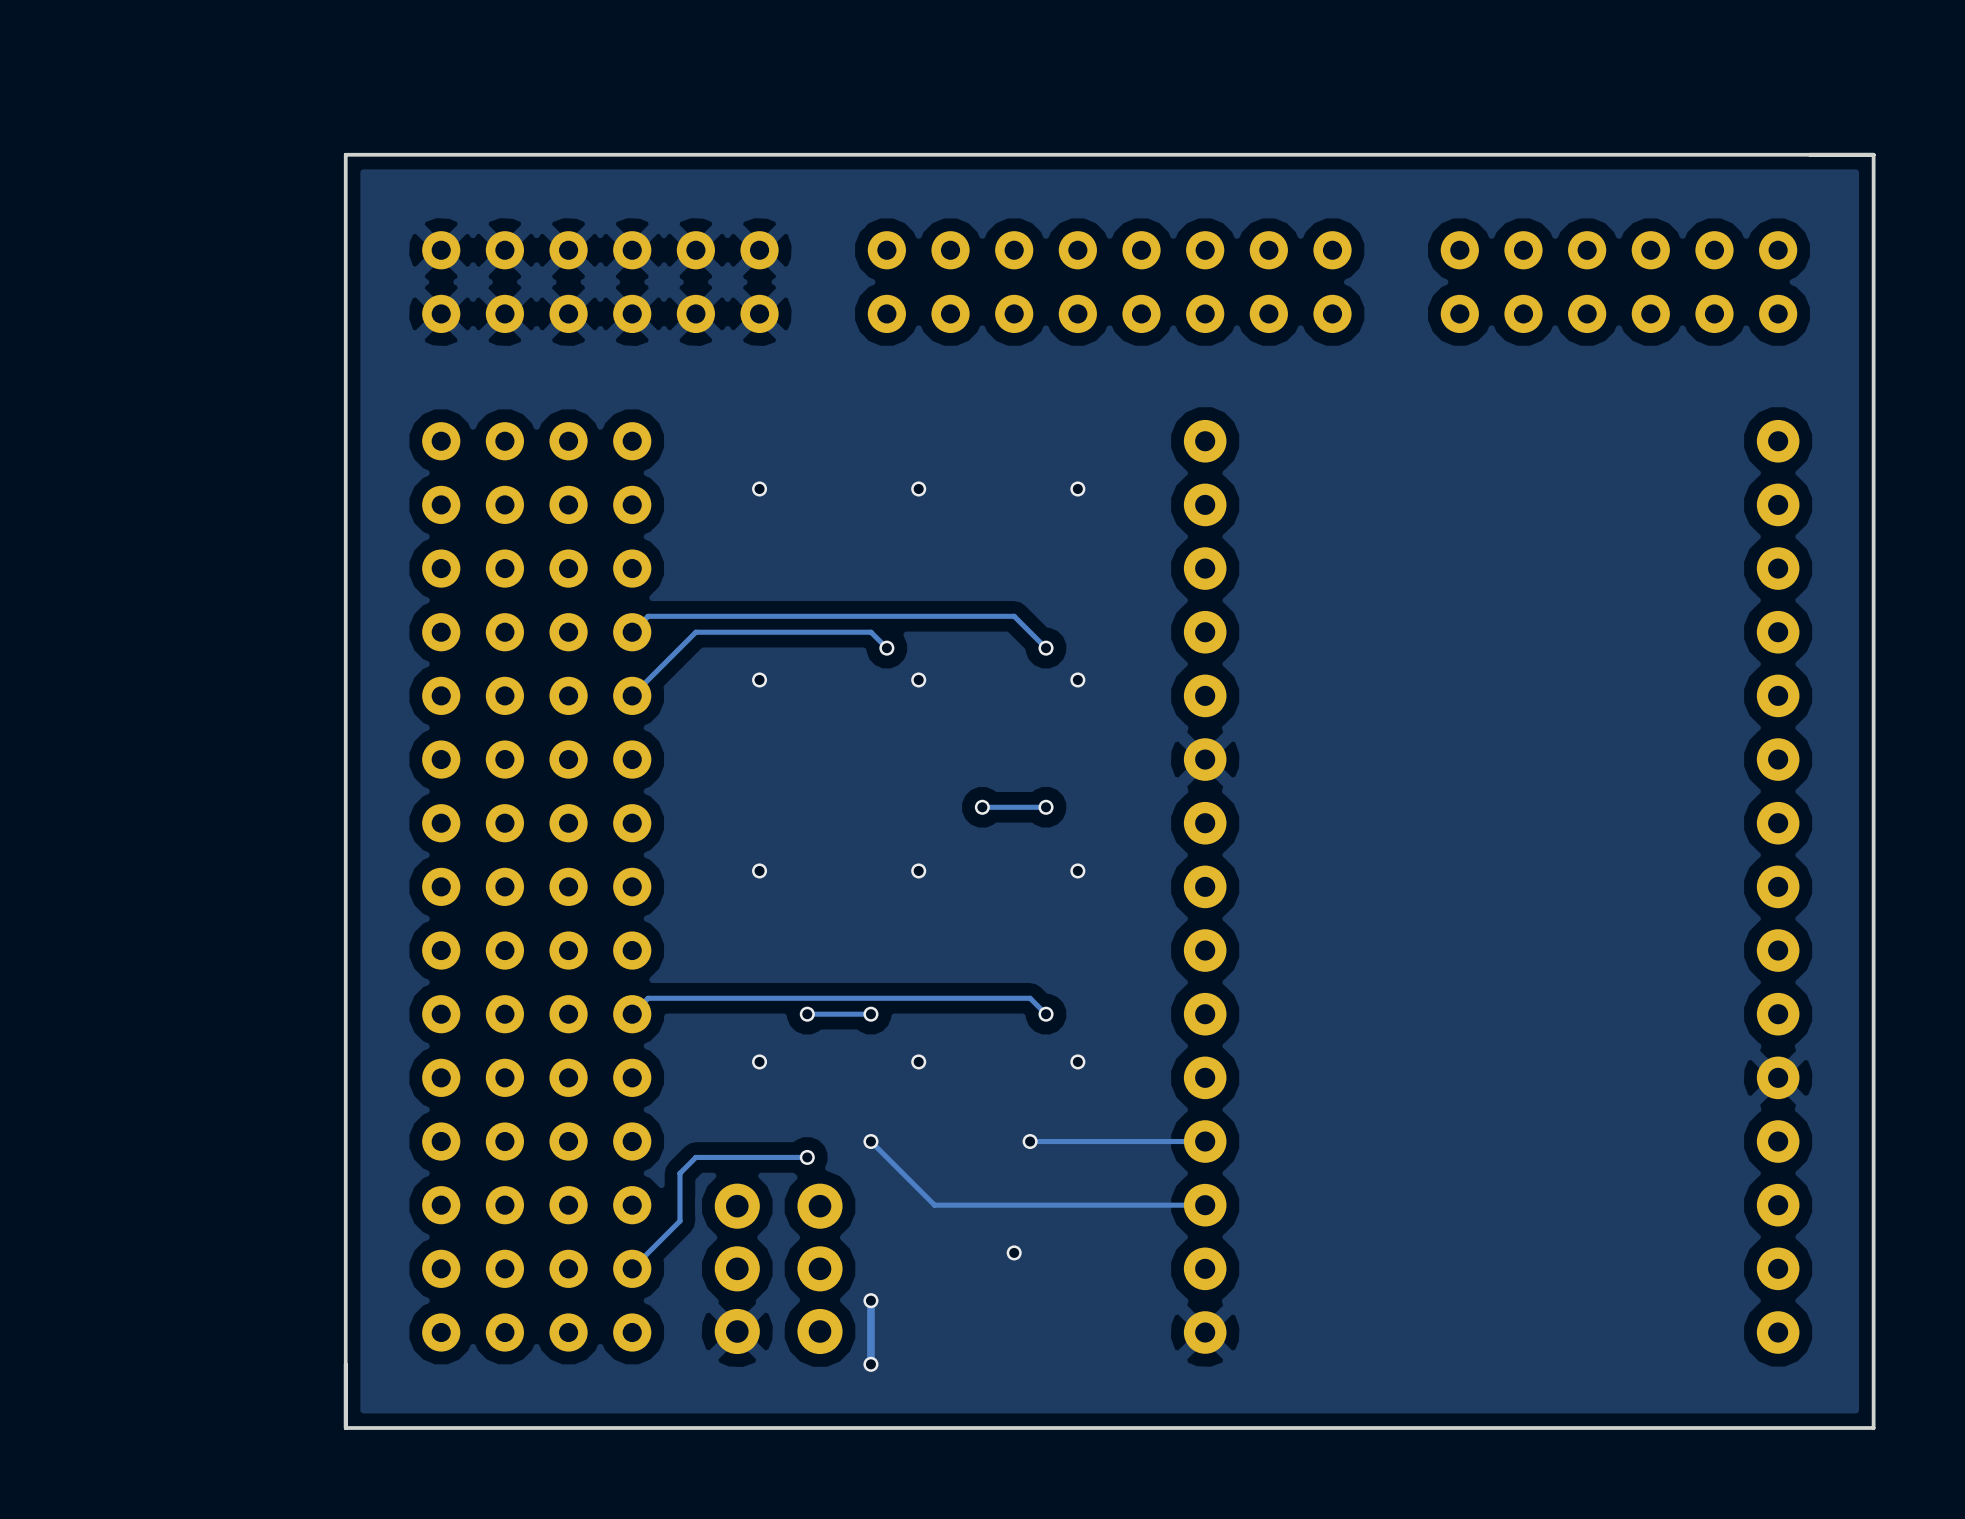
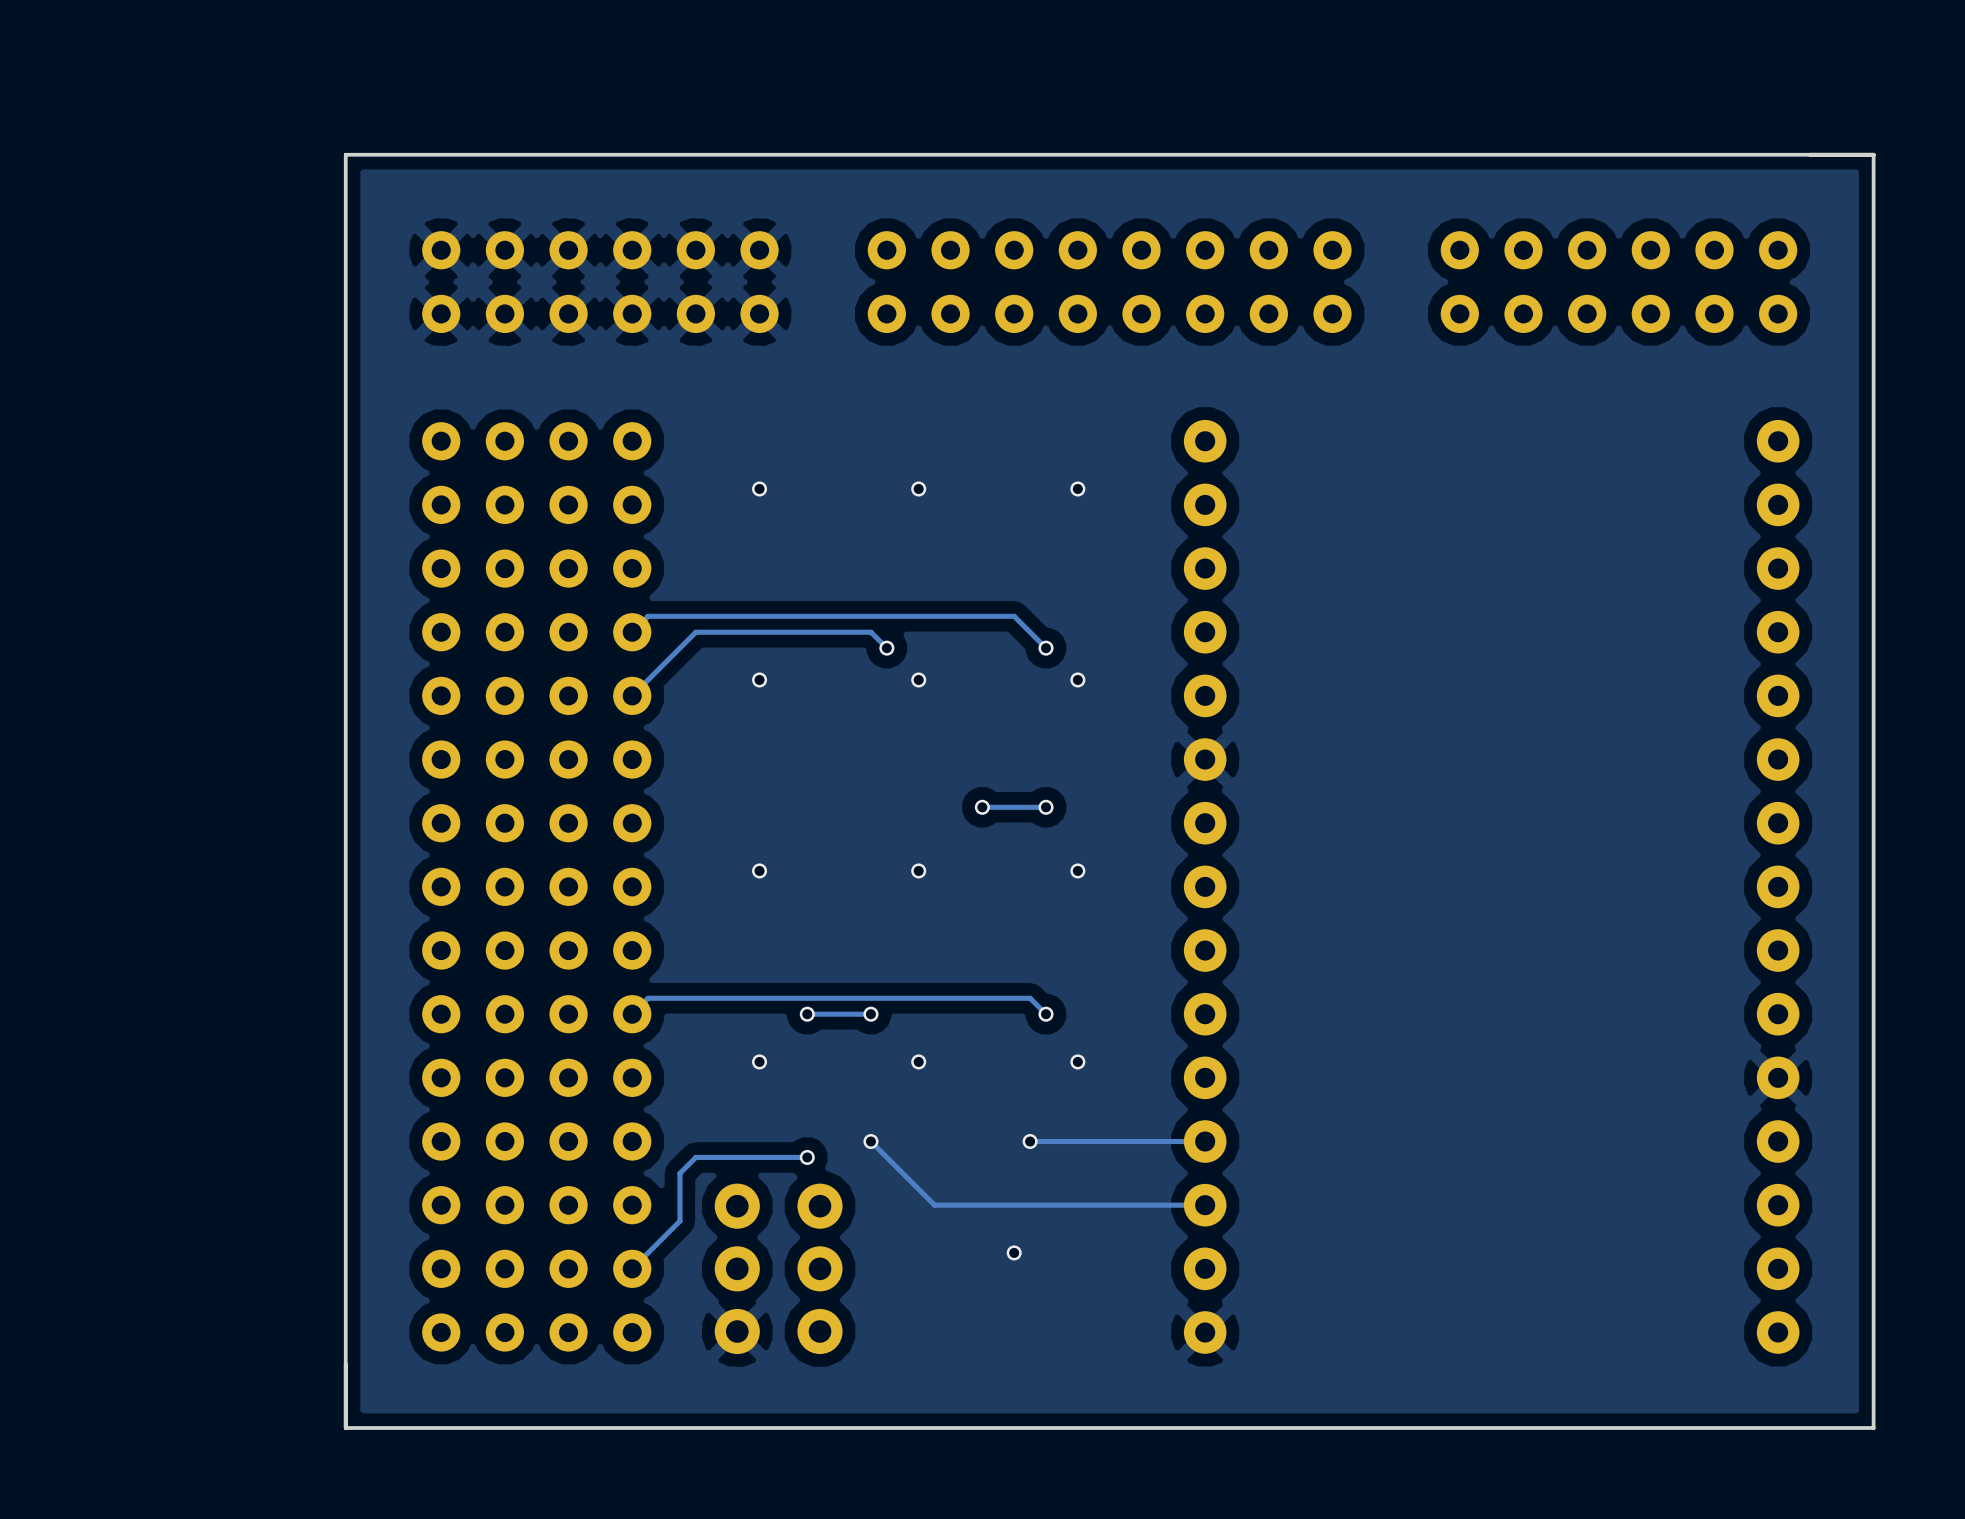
track: (870, 1300) (870, 1364) -> none
via: (870, 1300) -> none
via: (870, 1364) -> none

